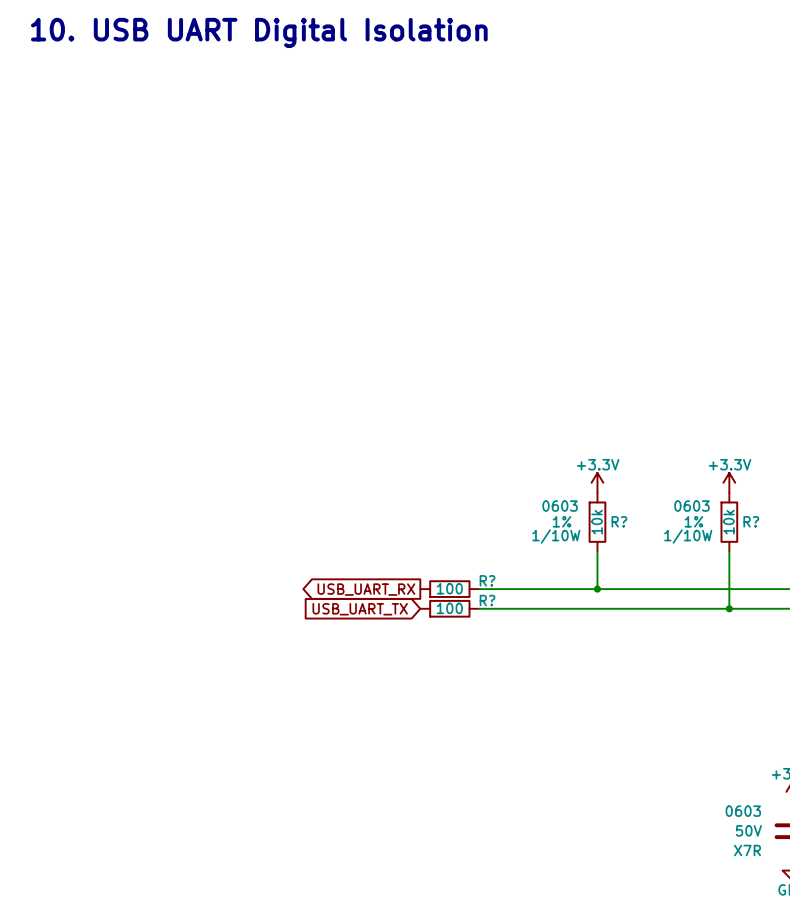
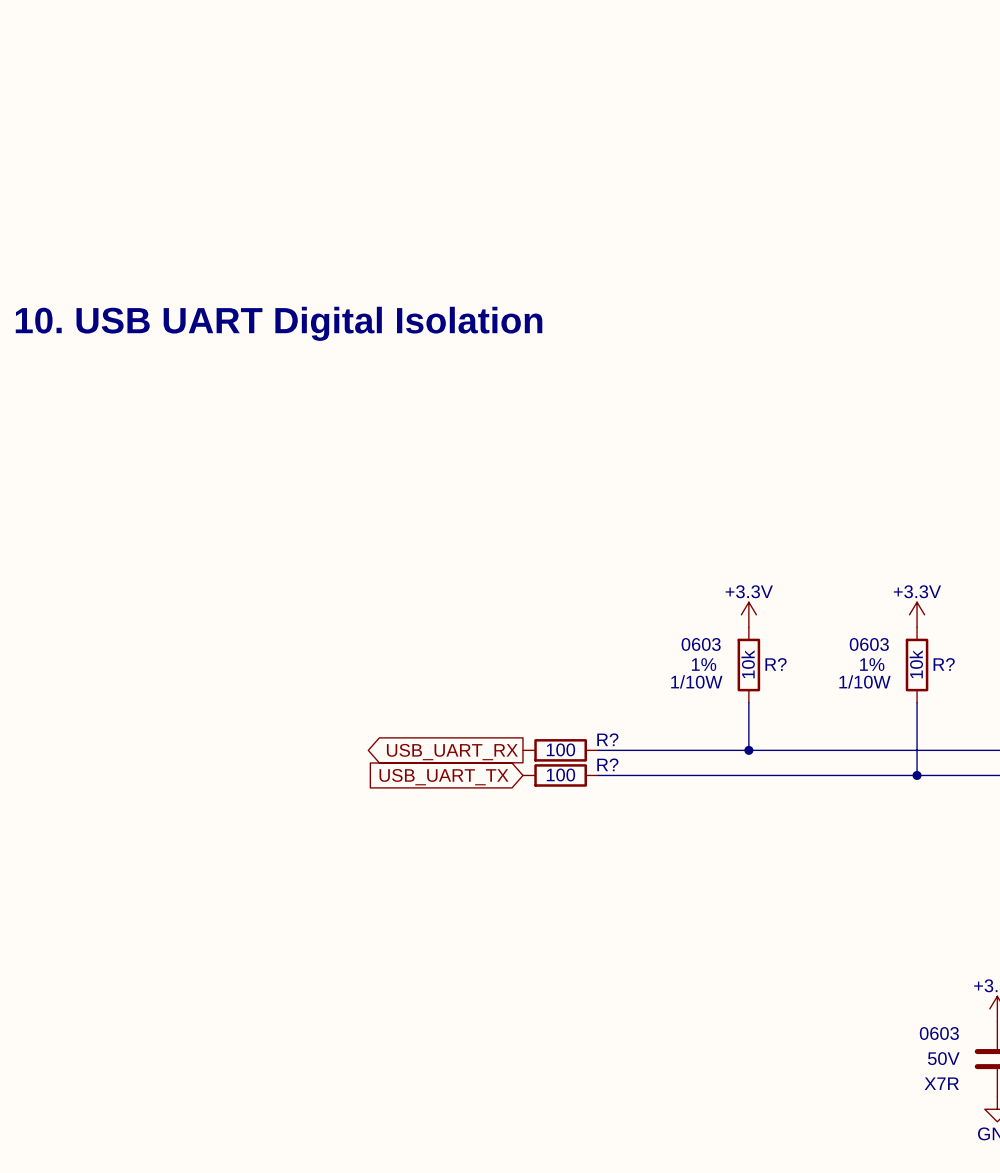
text: 10. USB UART Digital Isolation (259, 32) -> none
text: none -> 10. USB UART Digital Isolation (279, 323)

